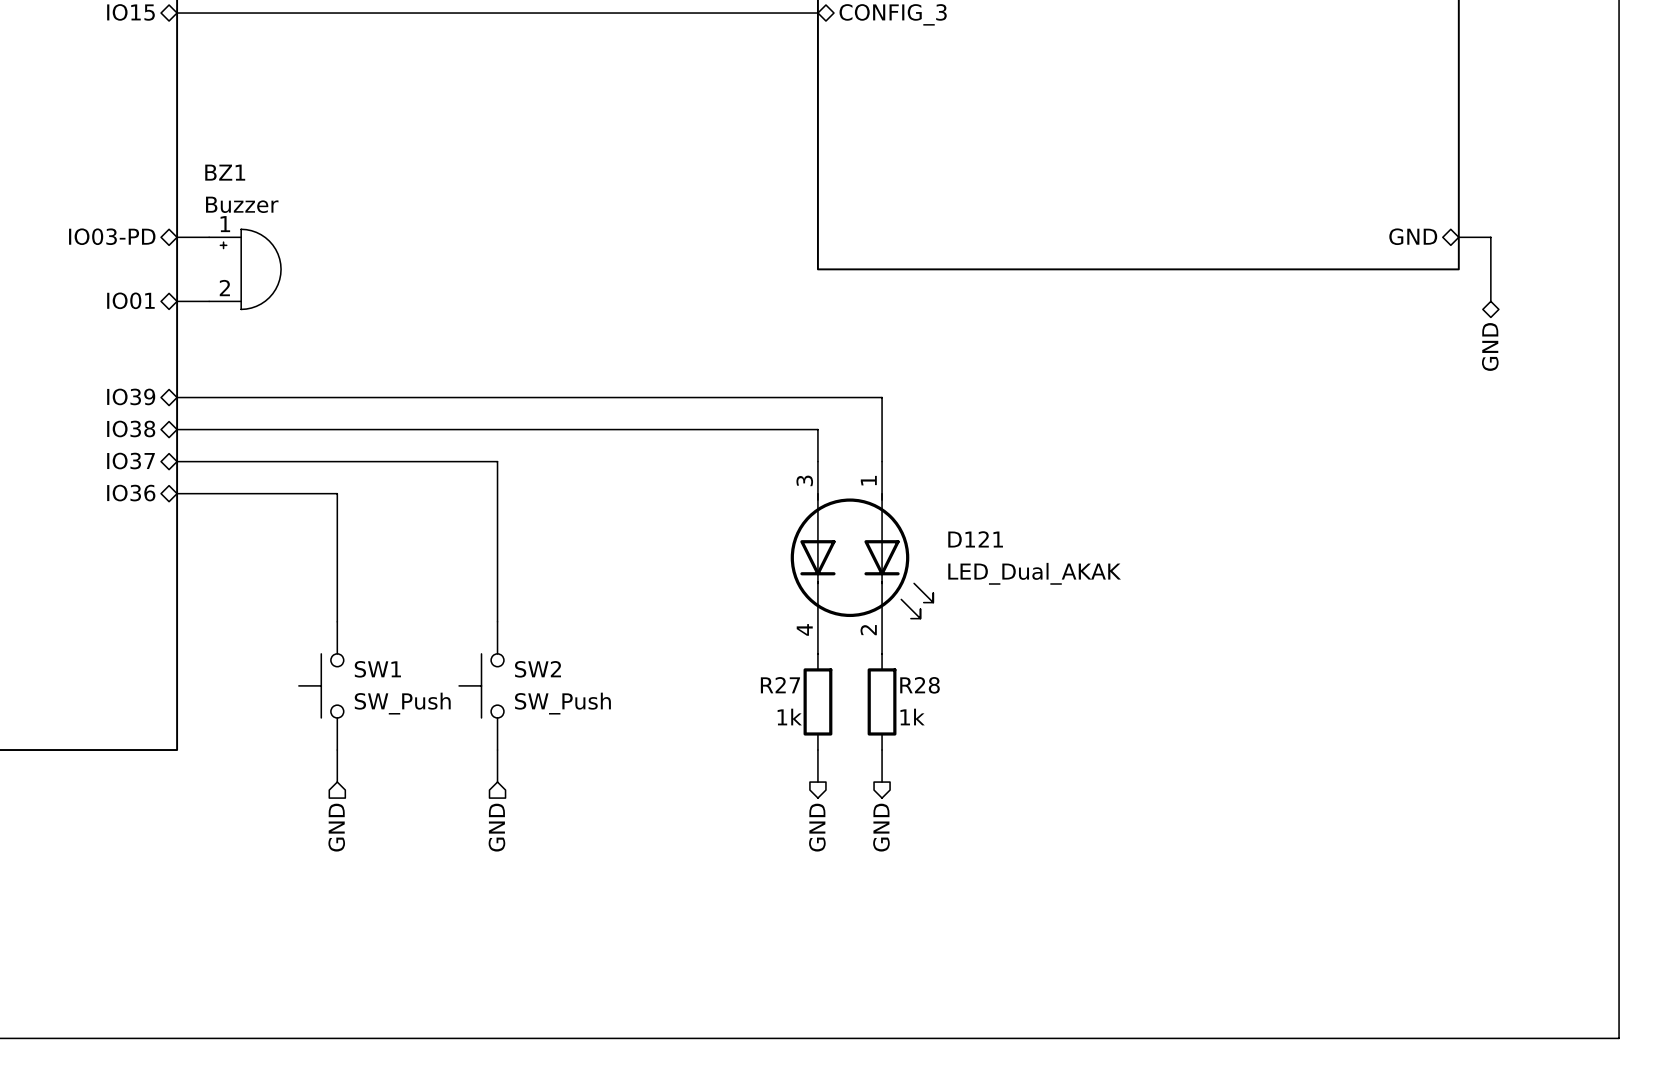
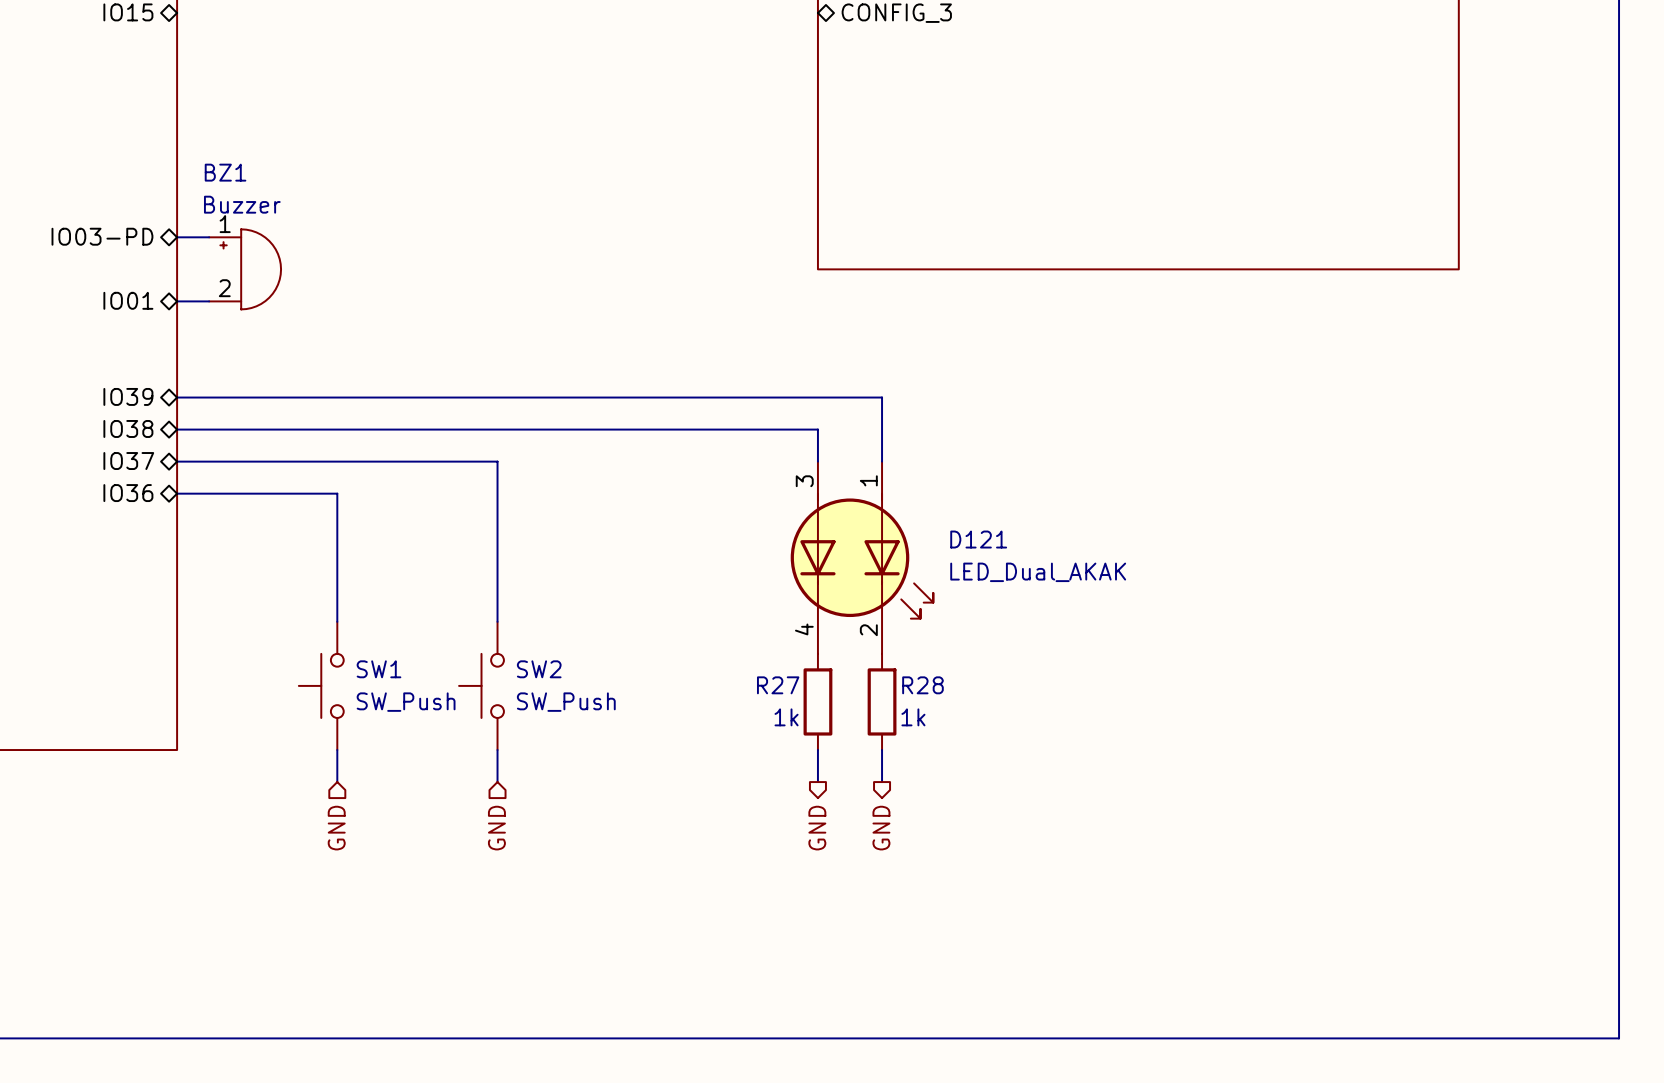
wire: (177, 13) (817, 13) -> none
sheet pin: GND (1413, 236) -> none
wire: (1458, 237) (1490, 237) (1490, 301) -> none
hierarchical label: GND (1490, 346) -> none

